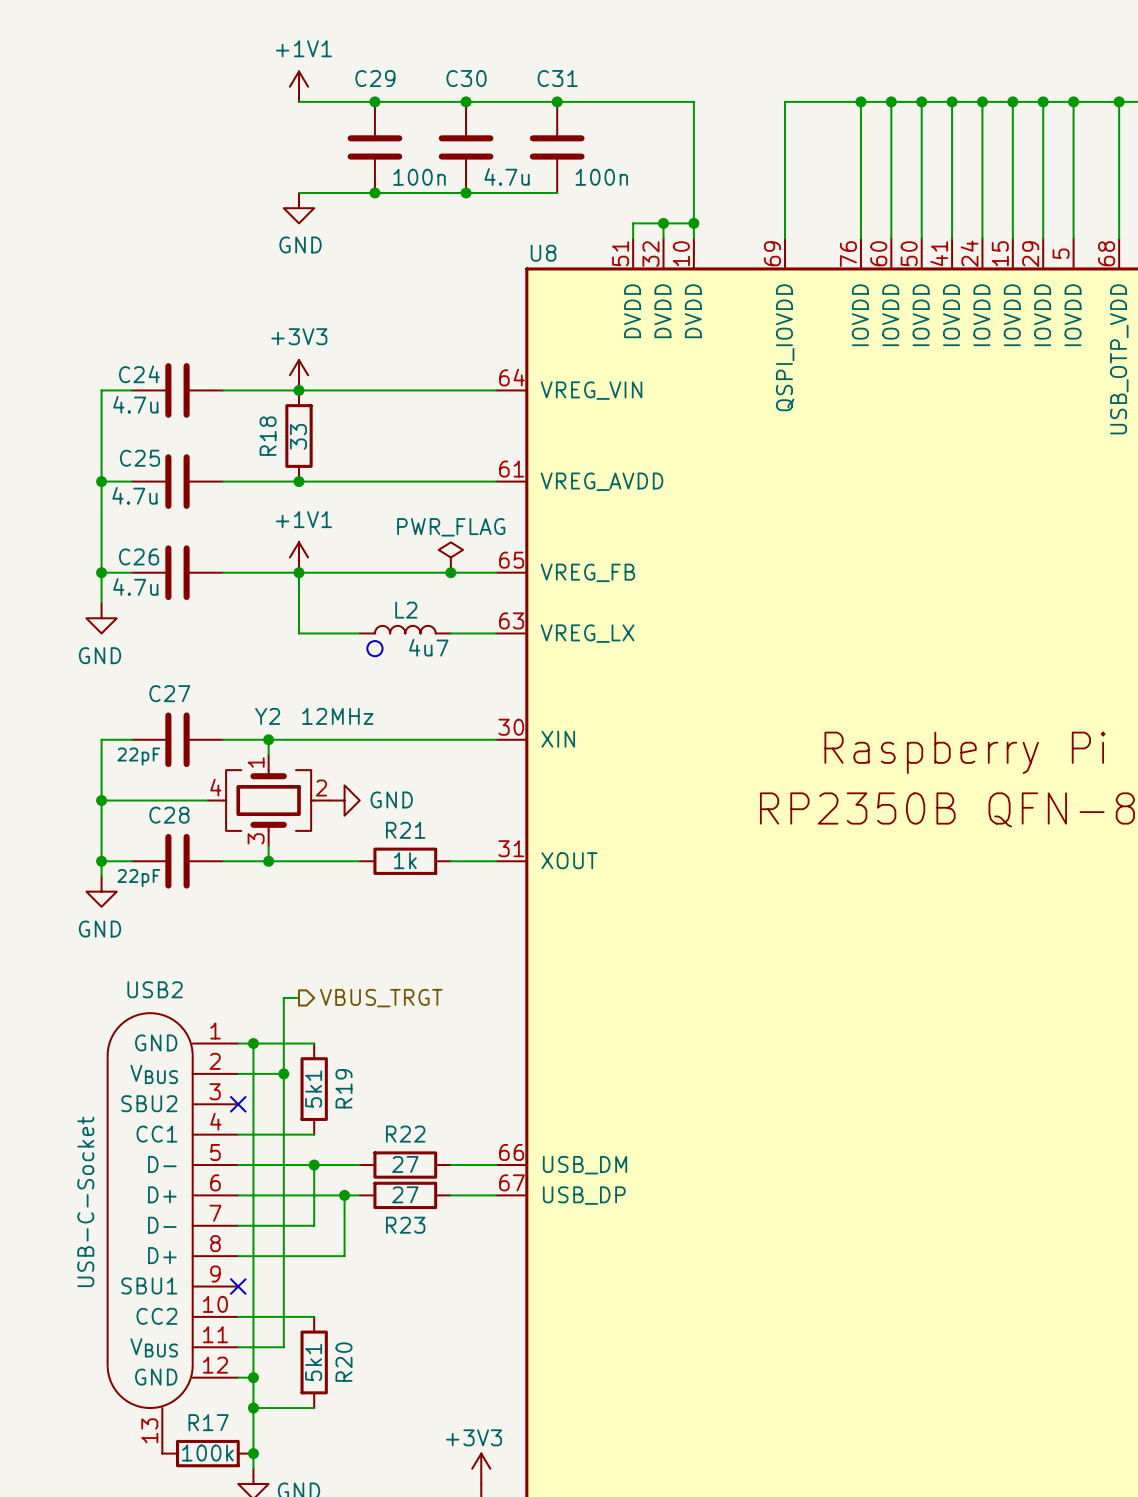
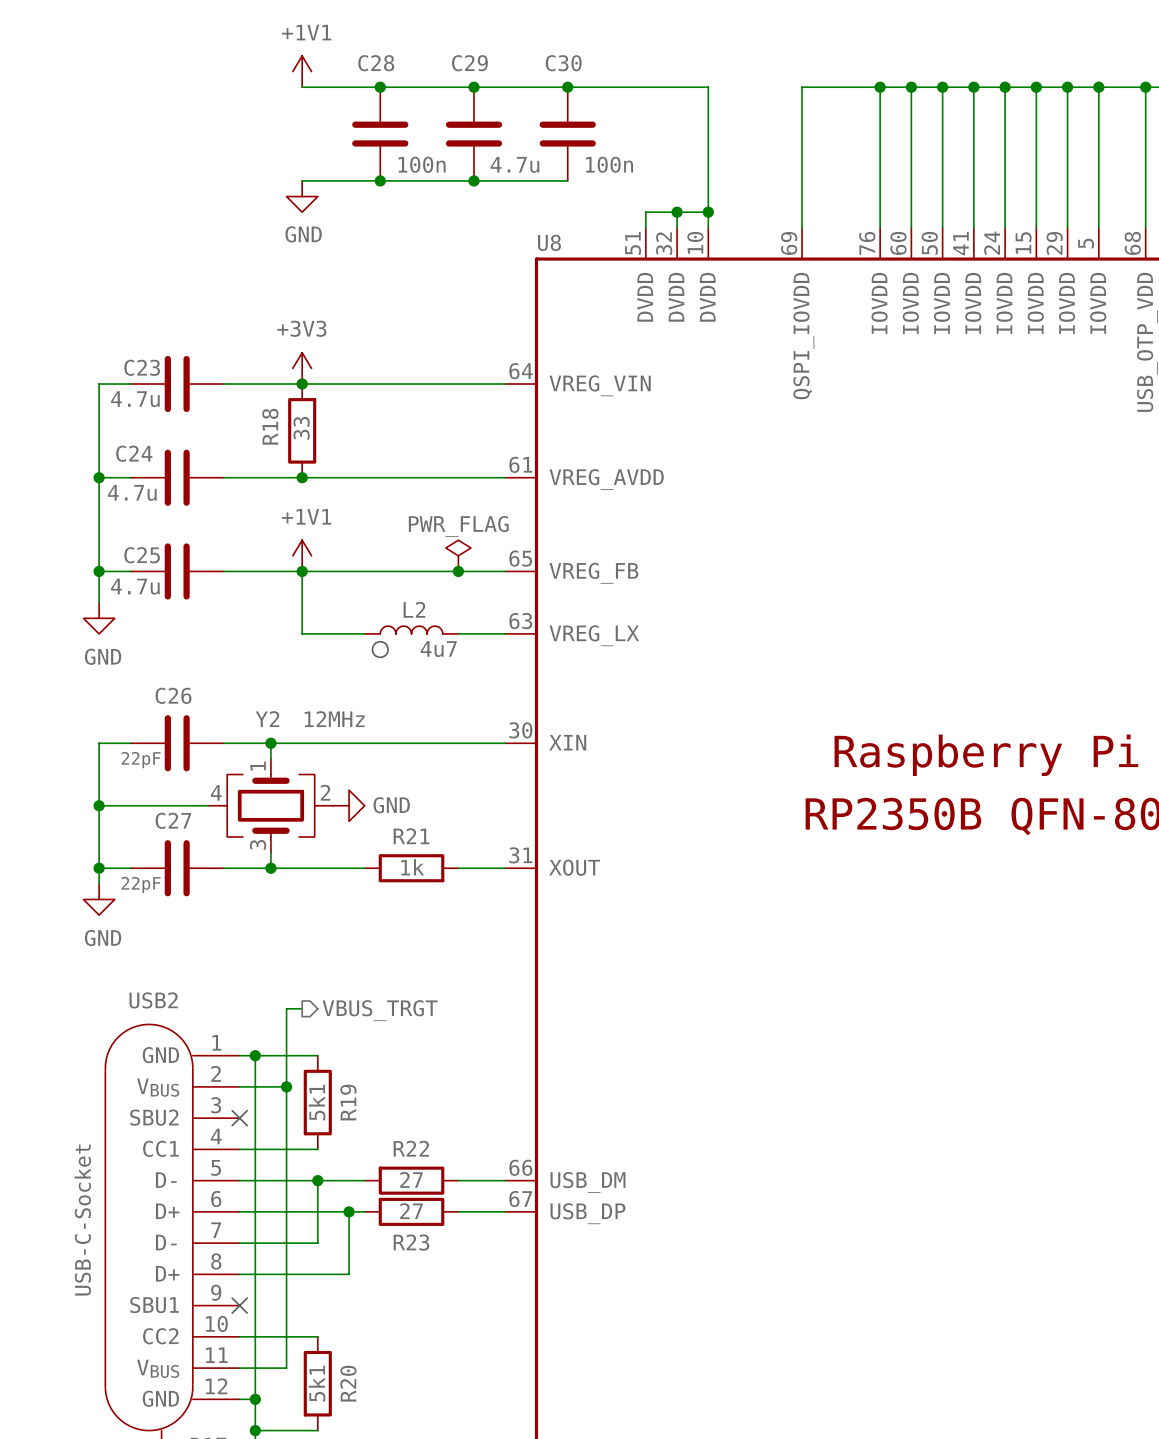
C29 name: C29 (375, 78) -> C28 (376, 63)
C30 name: C30 (466, 78) -> C29 (469, 63)
C31 name: C31 (557, 78) -> C30 (563, 63)
C24 name: C24 (139, 374) -> C23 (142, 367)
C25 name: C25 (140, 458) -> C24 (134, 453)
C26 name: C26 (139, 556) -> C25 (142, 555)
C27 name: C27 (169, 693) -> C26 (173, 695)
C28 name: C28 (169, 815) -> C27 (173, 820)

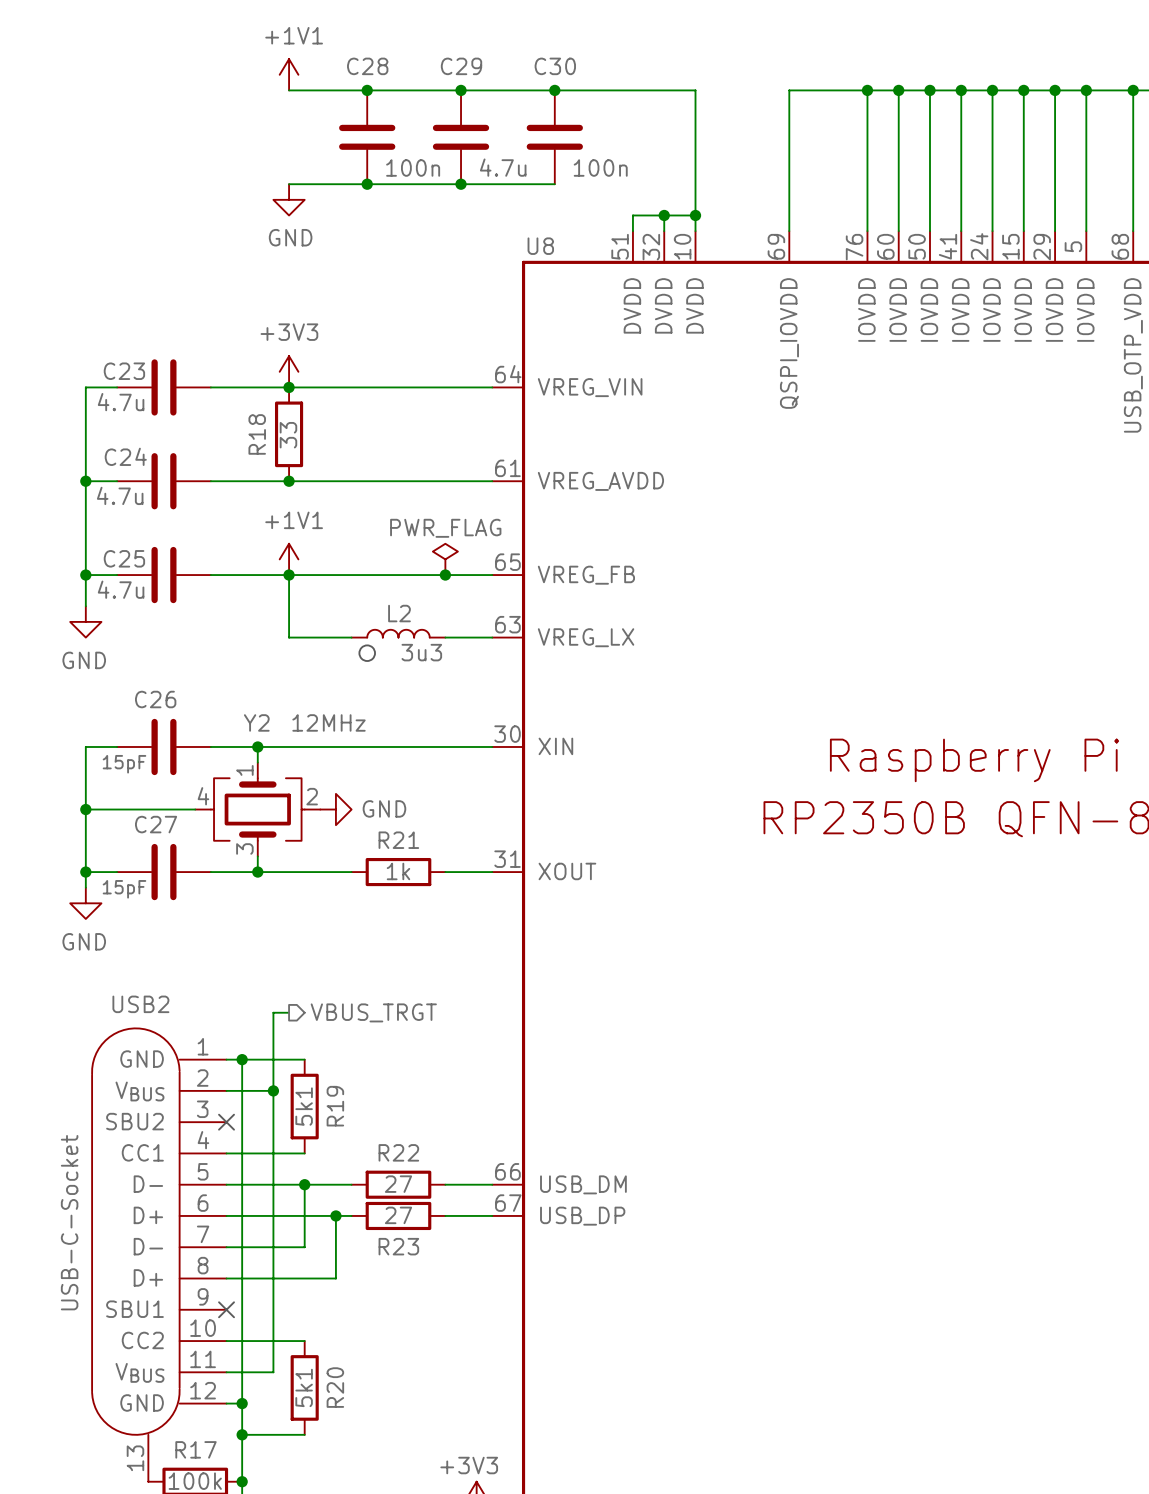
L2 value: 4u7 (438, 649) -> 3u3 (421, 652)
C26 value: 22pF (141, 760) -> 15pF (124, 764)
C27 value: 22pF (141, 885) -> 15pF (124, 889)

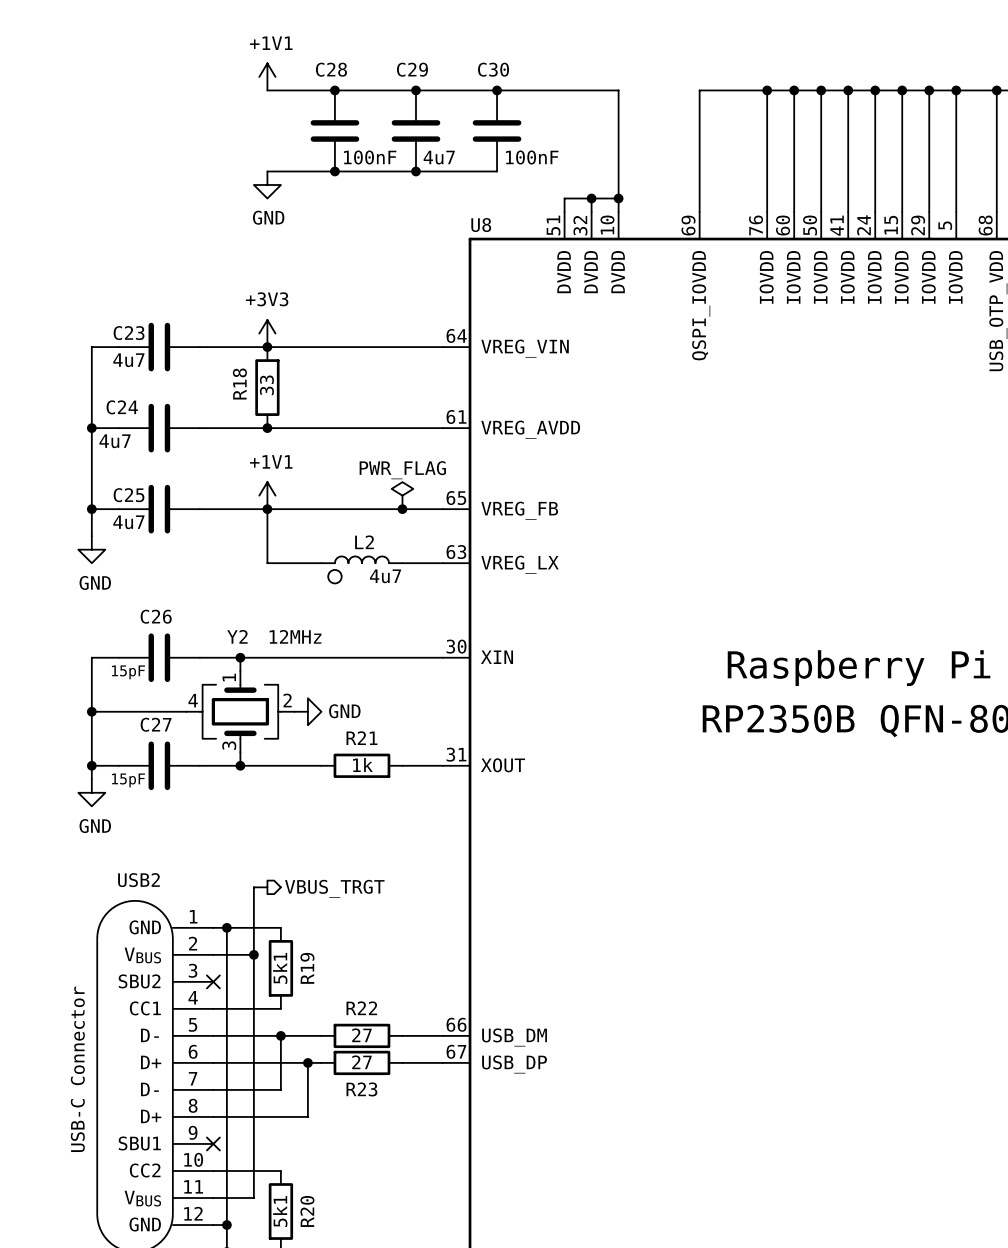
C28 value: 100n (413, 167) -> 100nF (370, 157)
C29 value: 4.7u (503, 167) -> 4u7 (439, 157)
C30 value: 100n (600, 167) -> 100nF (532, 157)
C23 value: 4.7u (121, 402) -> 4u7 (128, 360)
C24 value: 4.7u (120, 495) -> 4u7 (115, 441)
C25 value: 4.7u (121, 589) -> 4u7 (128, 522)
L2 value: 3u3 (421, 652) -> 4u7 (385, 576)
USB2 value: USB-C-Socket (69, 1222) -> USB-C Connector (77, 1069)

